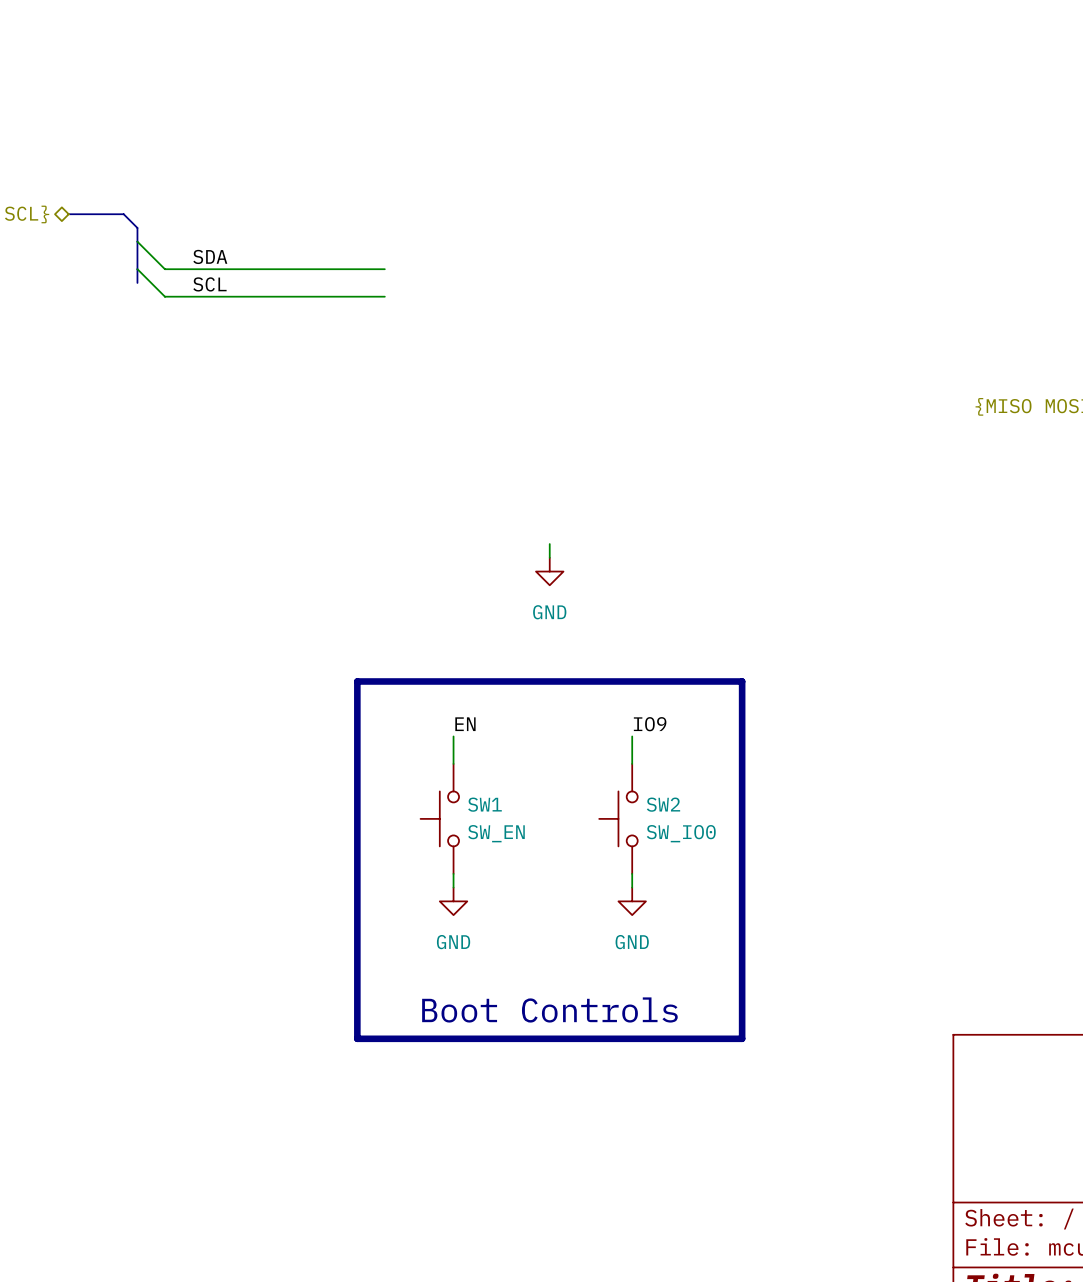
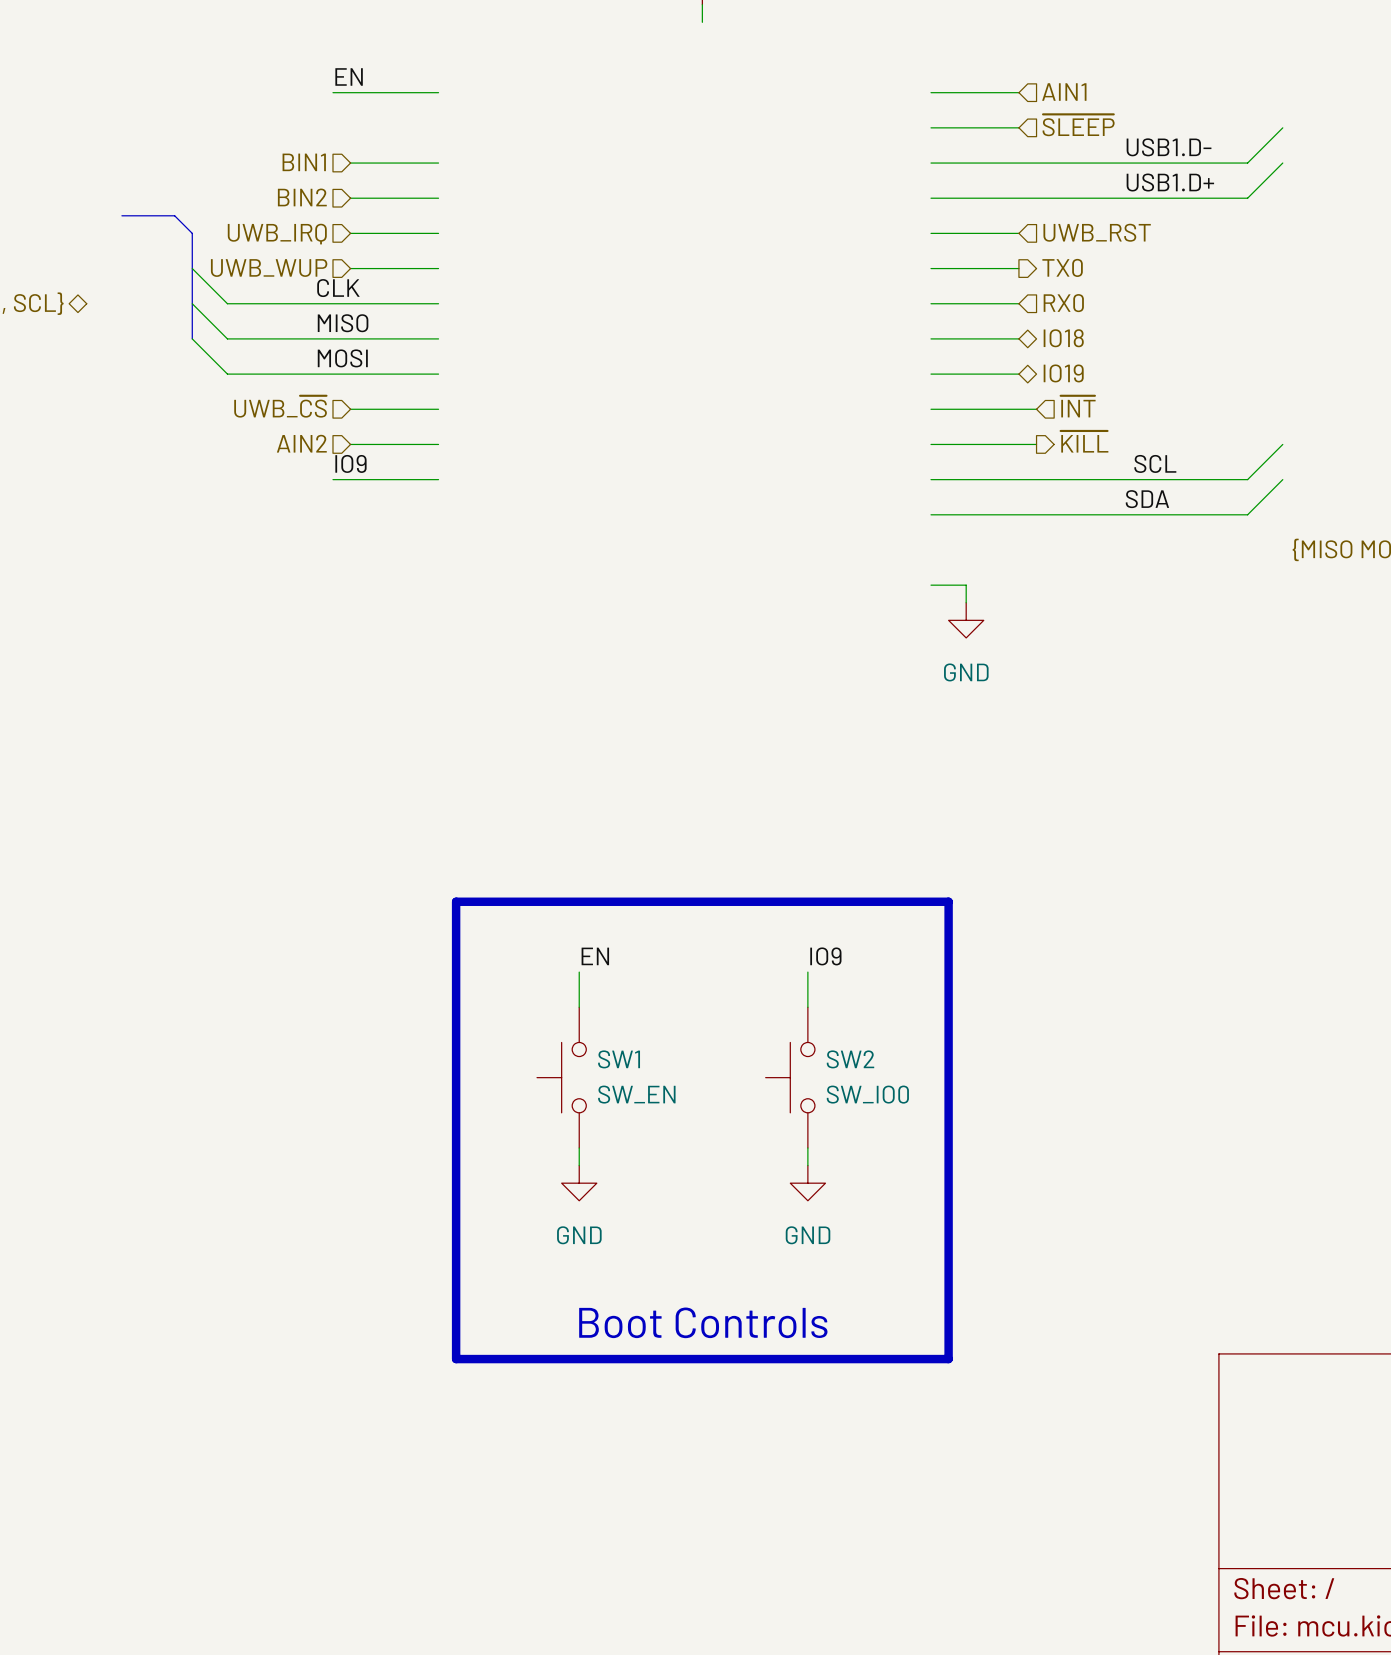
label: none -> EN (349, 76)
hierarchical label: none -> AIN1 (1064, 92)
wire: none -> (332, 92) (438, 92)
wire: none -> (931, 92) (1018, 92)
hierarchical label: none -> ~{SLEEP} (1078, 125)
wire: none -> (931, 127) (1018, 127)
wire: none -> (1282, 127) (1247, 163) (931, 163)
label: none -> USB1.D- (1169, 147)
hierarchical label: none -> BIN1 (304, 162)
wire: none -> (350, 163) (438, 163)
wire: none -> (1282, 163) (1247, 198) (931, 198)
label: none -> USB1.D+ (1170, 182)
hierarchical label: none -> BIN2 (302, 197)
wire: none -> (350, 198) (438, 198)
bus: none -> (121, 215) (174, 215) (192, 233) (192, 338)
wire: none -> (350, 233) (438, 233)
wire: none -> (931, 233) (1018, 233)
hierarchical label: none -> UWB_IRQ (277, 234)
hierarchical label: none -> UWB_RST (1097, 232)
wire: none -> (192, 268) (227, 303) (438, 303)
wire: none -> (350, 268) (438, 268)
wire: none -> (931, 268) (1018, 268)
hierarchical label: none -> TX0 (1062, 267)
hierarchical label: none -> UWB_WUP (269, 267)
label: none -> CLK (338, 288)
hierarchical label: none -> RX0 (1063, 303)
bus: (68, 214) (123, 214) (137, 227) (137, 282) -> none
wire: none -> (192, 303) (227, 338) (438, 338)
wire: none -> (931, 303) (1018, 303)
label: none -> MISO (343, 323)
wire: (137, 241) (164, 269) (178, 269) -> (192, 338) (227, 374)
wire: none -> (931, 338) (1018, 338)
hierarchical label: none -> IO18 (1063, 338)
label: SDA (210, 256) -> none
label: none -> MOSI (342, 358)
hierarchical label: none -> IO19 (1063, 373)
wire: (137, 269) (164, 296) (274, 296) -> none
wire: (343, 269) (384, 269) -> none
wire: none -> (931, 374) (1018, 374)
label: SCL (209, 284) -> none
hierarchical label: none -> ~{INT} (1078, 406)
hierarchical label: none -> UWB_~{CS} (280, 406)
wire: (343, 296) (384, 296) -> none
wire: none -> (931, 409) (1036, 409)
hierarchical label: none -> ~{KILL} (1084, 441)
hierarchical label: none -> AIN2 (301, 443)
wire: none -> (350, 444) (438, 444)
wire: none -> (931, 444) (1036, 444)
wire: none -> (1282, 444) (1247, 479) (931, 479)
label: none -> IO9 (350, 463)
label: none -> SCL (1155, 463)
wire: none -> (332, 479) (438, 479)
wire: none -> (1282, 479) (1247, 514) (931, 514)
label: none -> SDA (1147, 499)
wire: none -> (931, 585) (966, 585) (966, 602)
wire: (549, 544) (549, 557) -> none
power symbol position: GND (549, 571) -> GND (966, 620)

